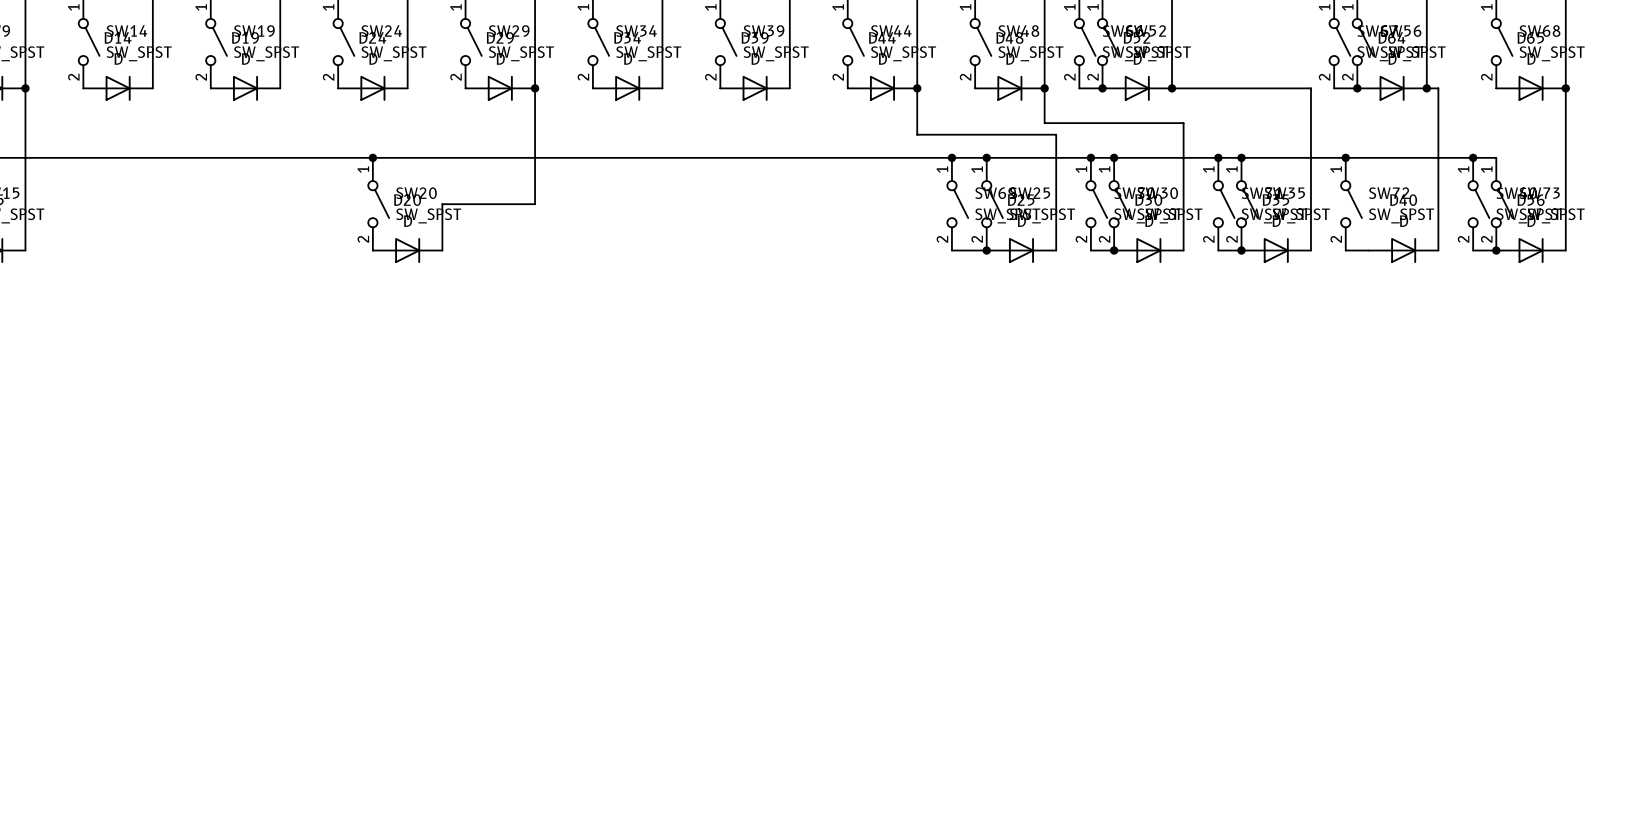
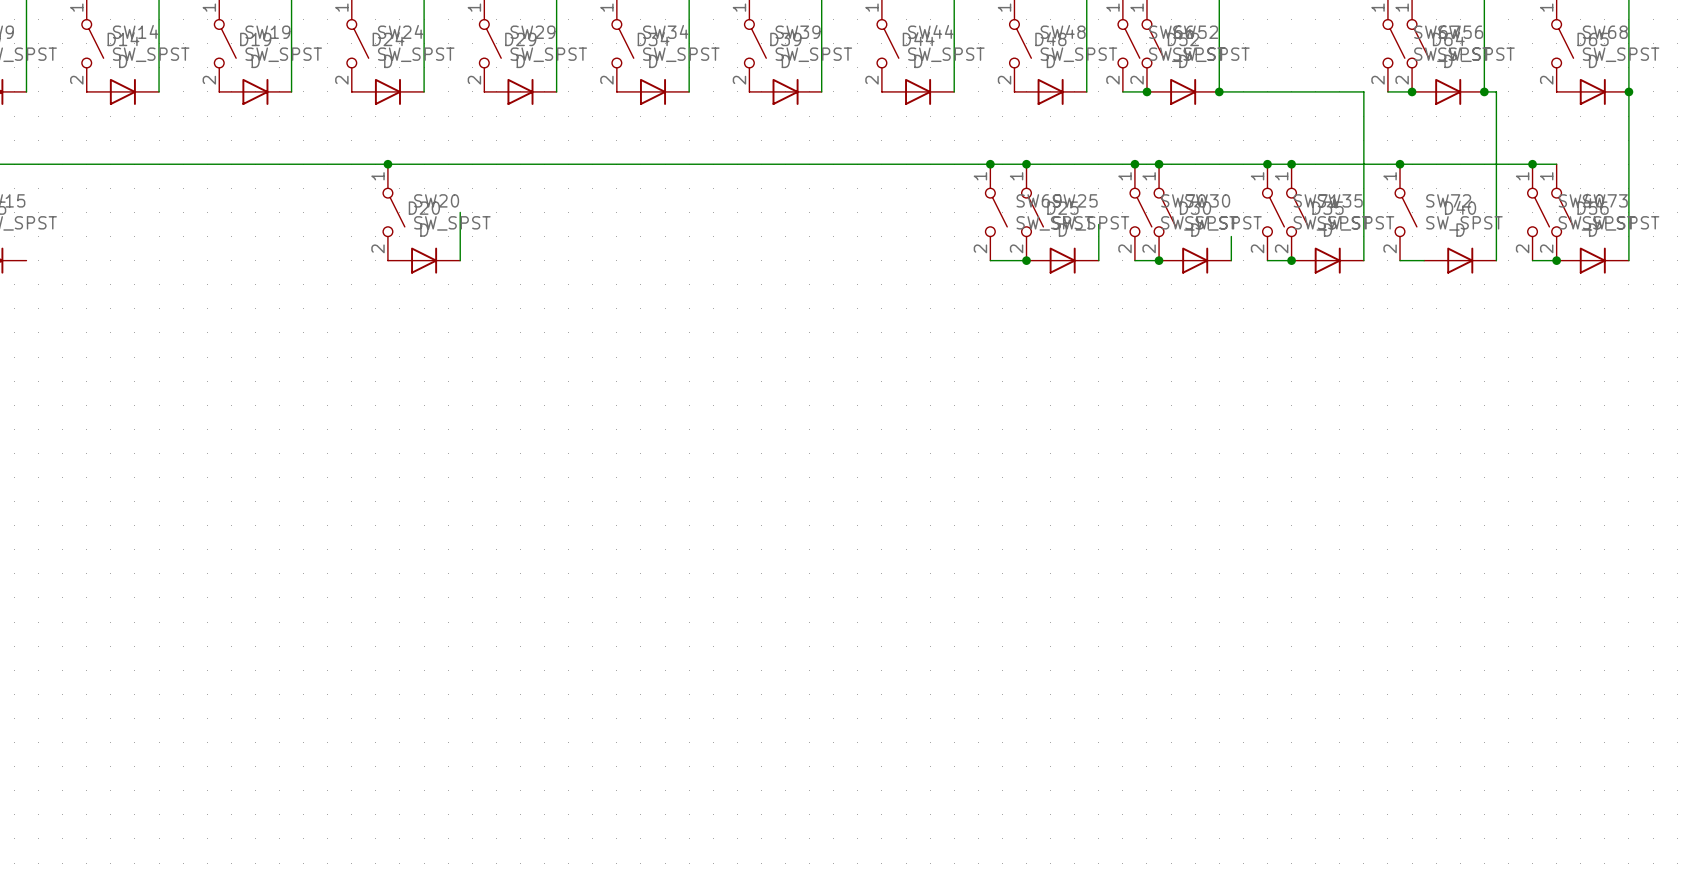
wire: (25, 88) (25, 250) -> none
junction: (25, 88) -> none
wire: (535, 88) (535, 204) (442, 204) -> none
junction: (535, 88) -> none
wire: (917, 88) (917, 134) (1056, 134) (1056, 215) -> none
junction: (917, 88) -> none
wire: (1044, 88) (1044, 123) (1183, 123) (1183, 227) -> none
junction: (1044, 88) -> none

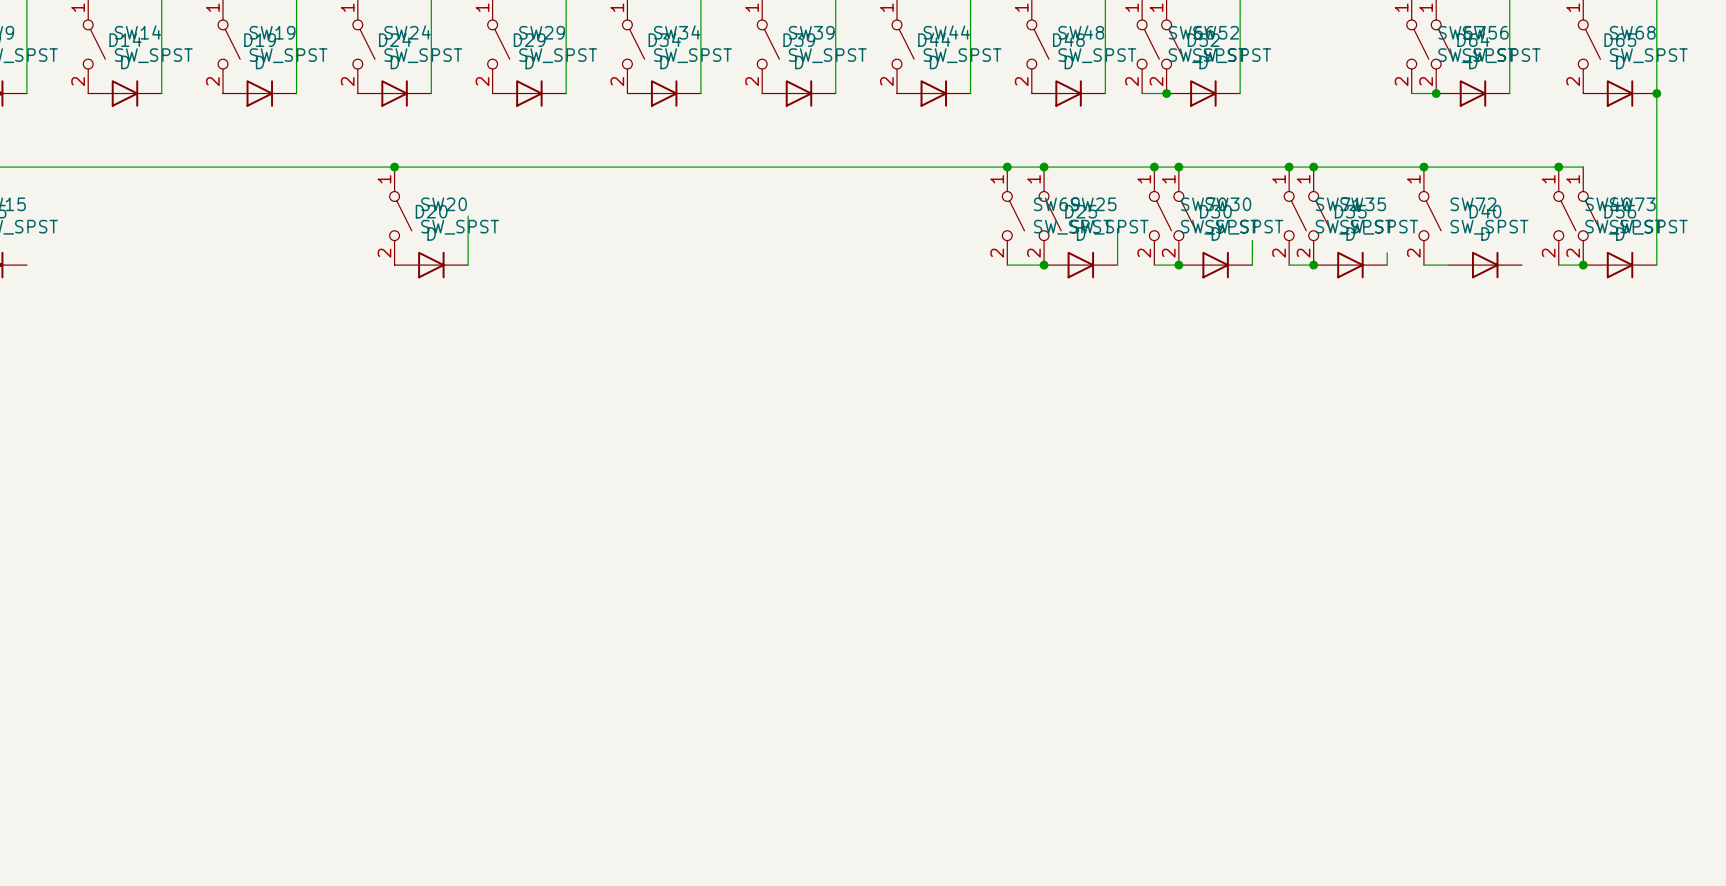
wire: (1219, 91) (1363, 91) (1363, 248) -> none
junction: (1219, 91) -> none
wire: (1484, 91) (1496, 91) (1496, 260) -> none
junction: (1484, 91) -> none

